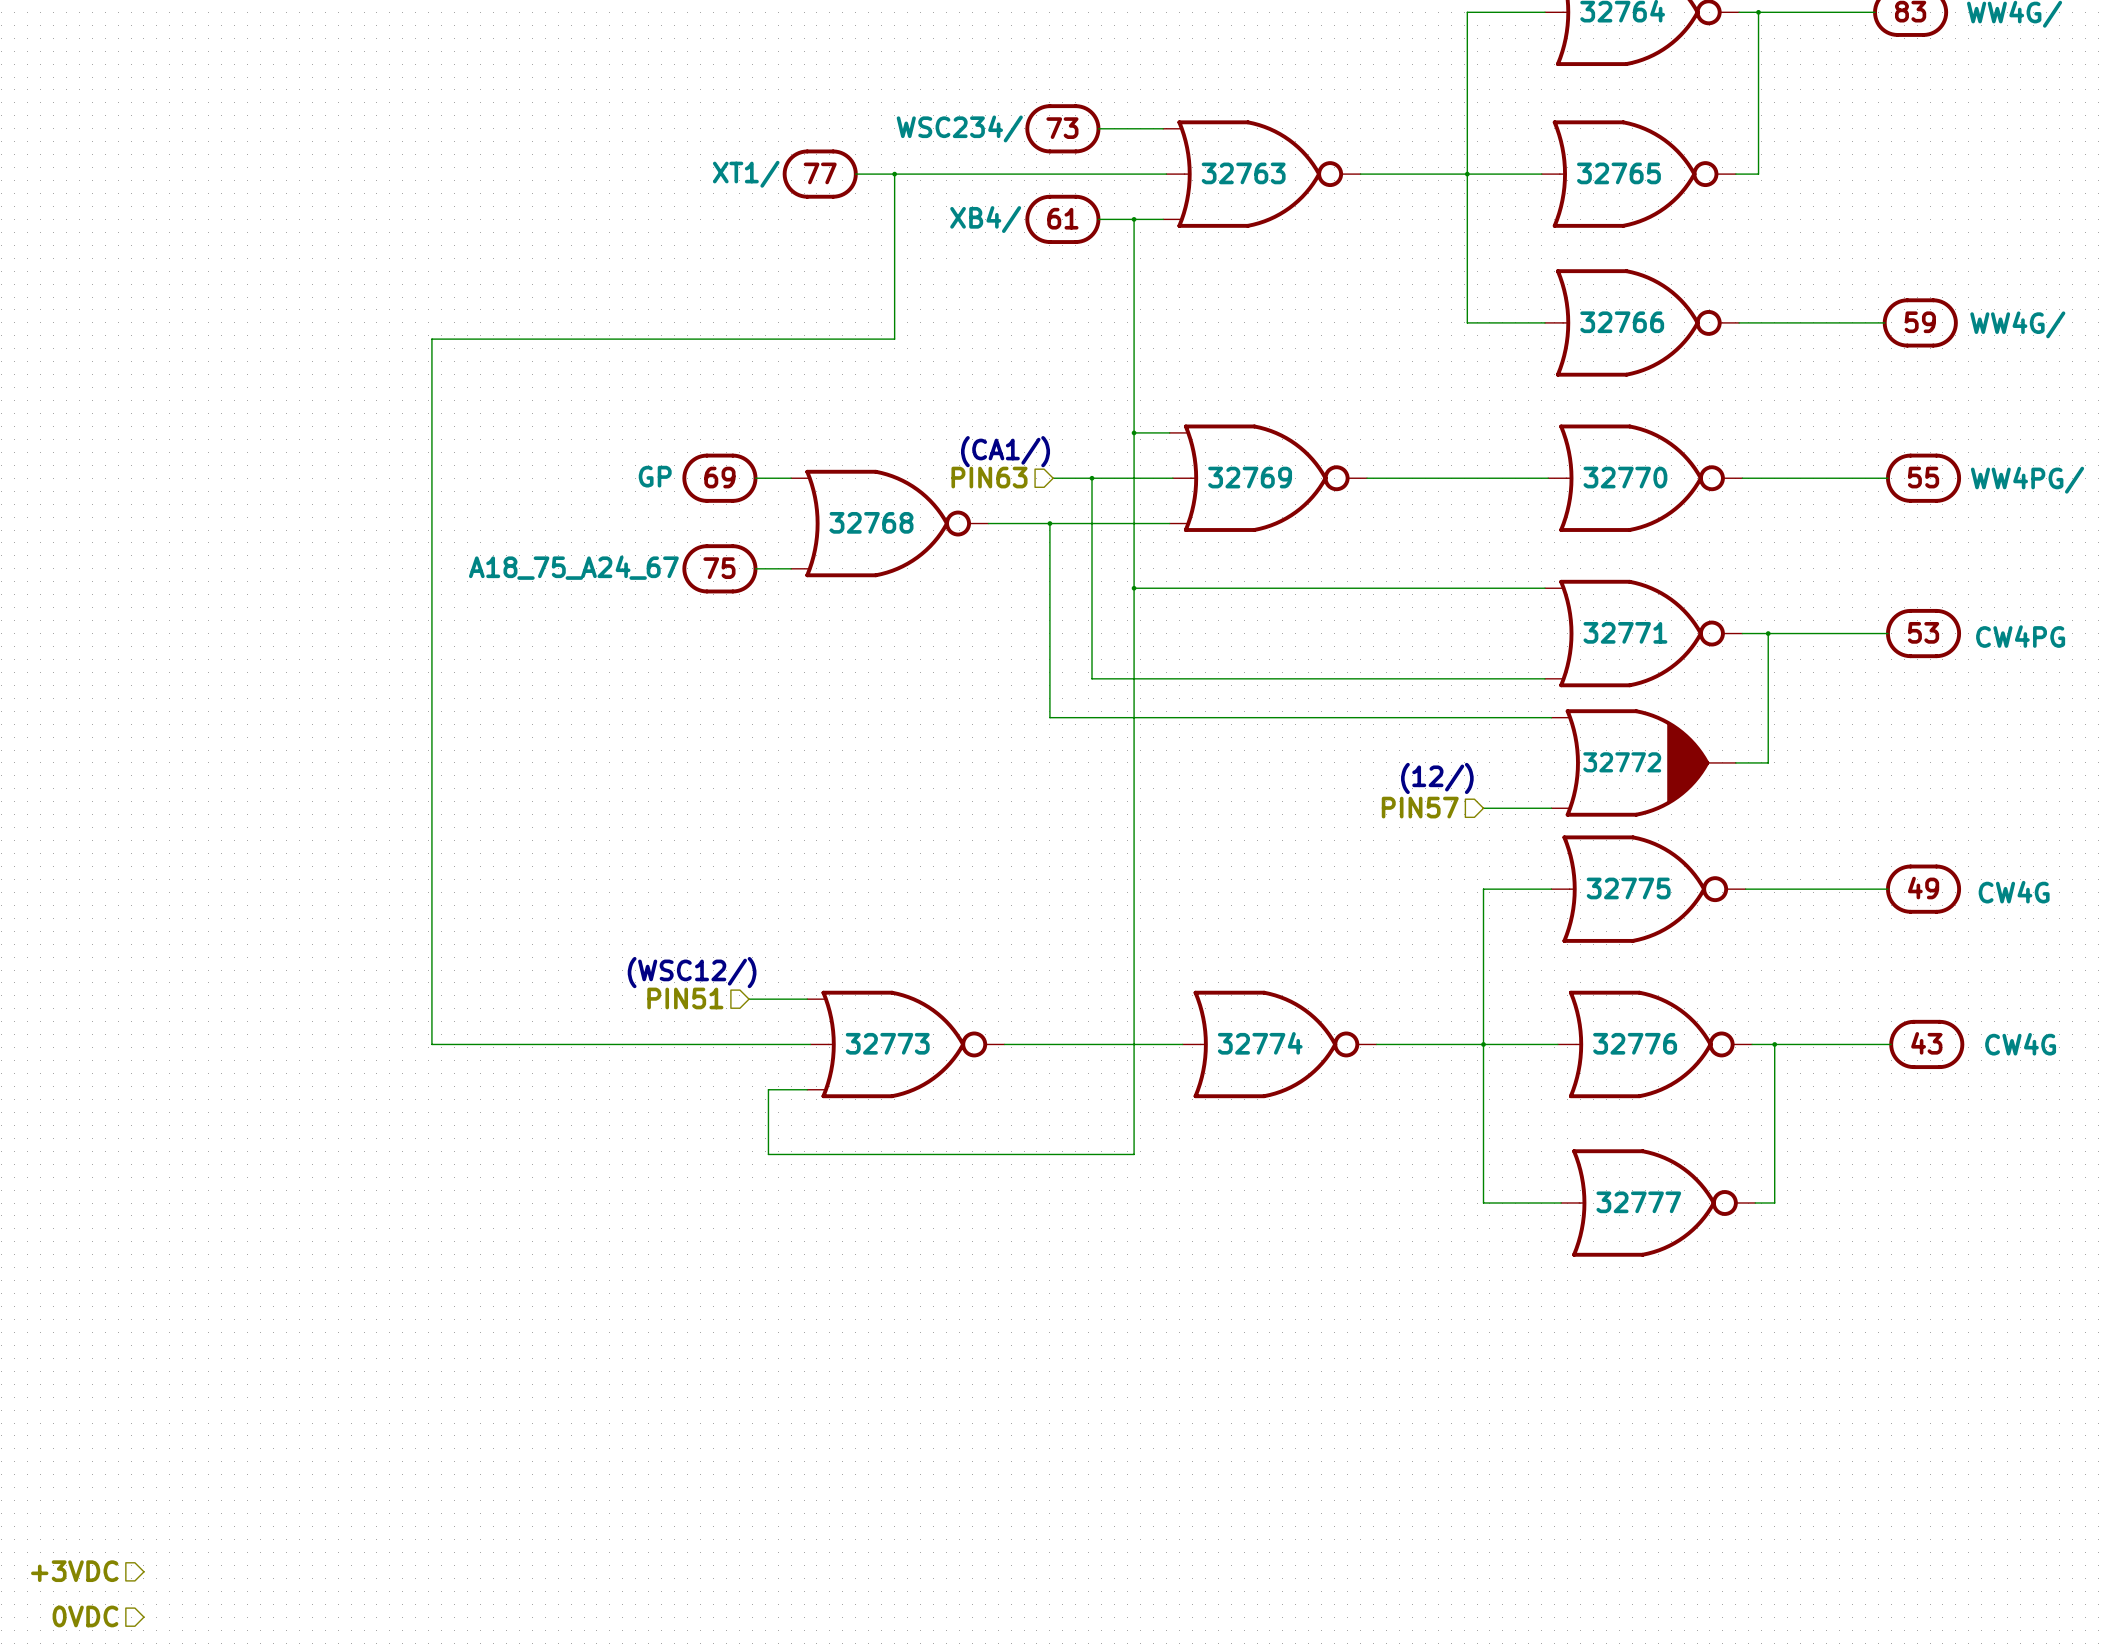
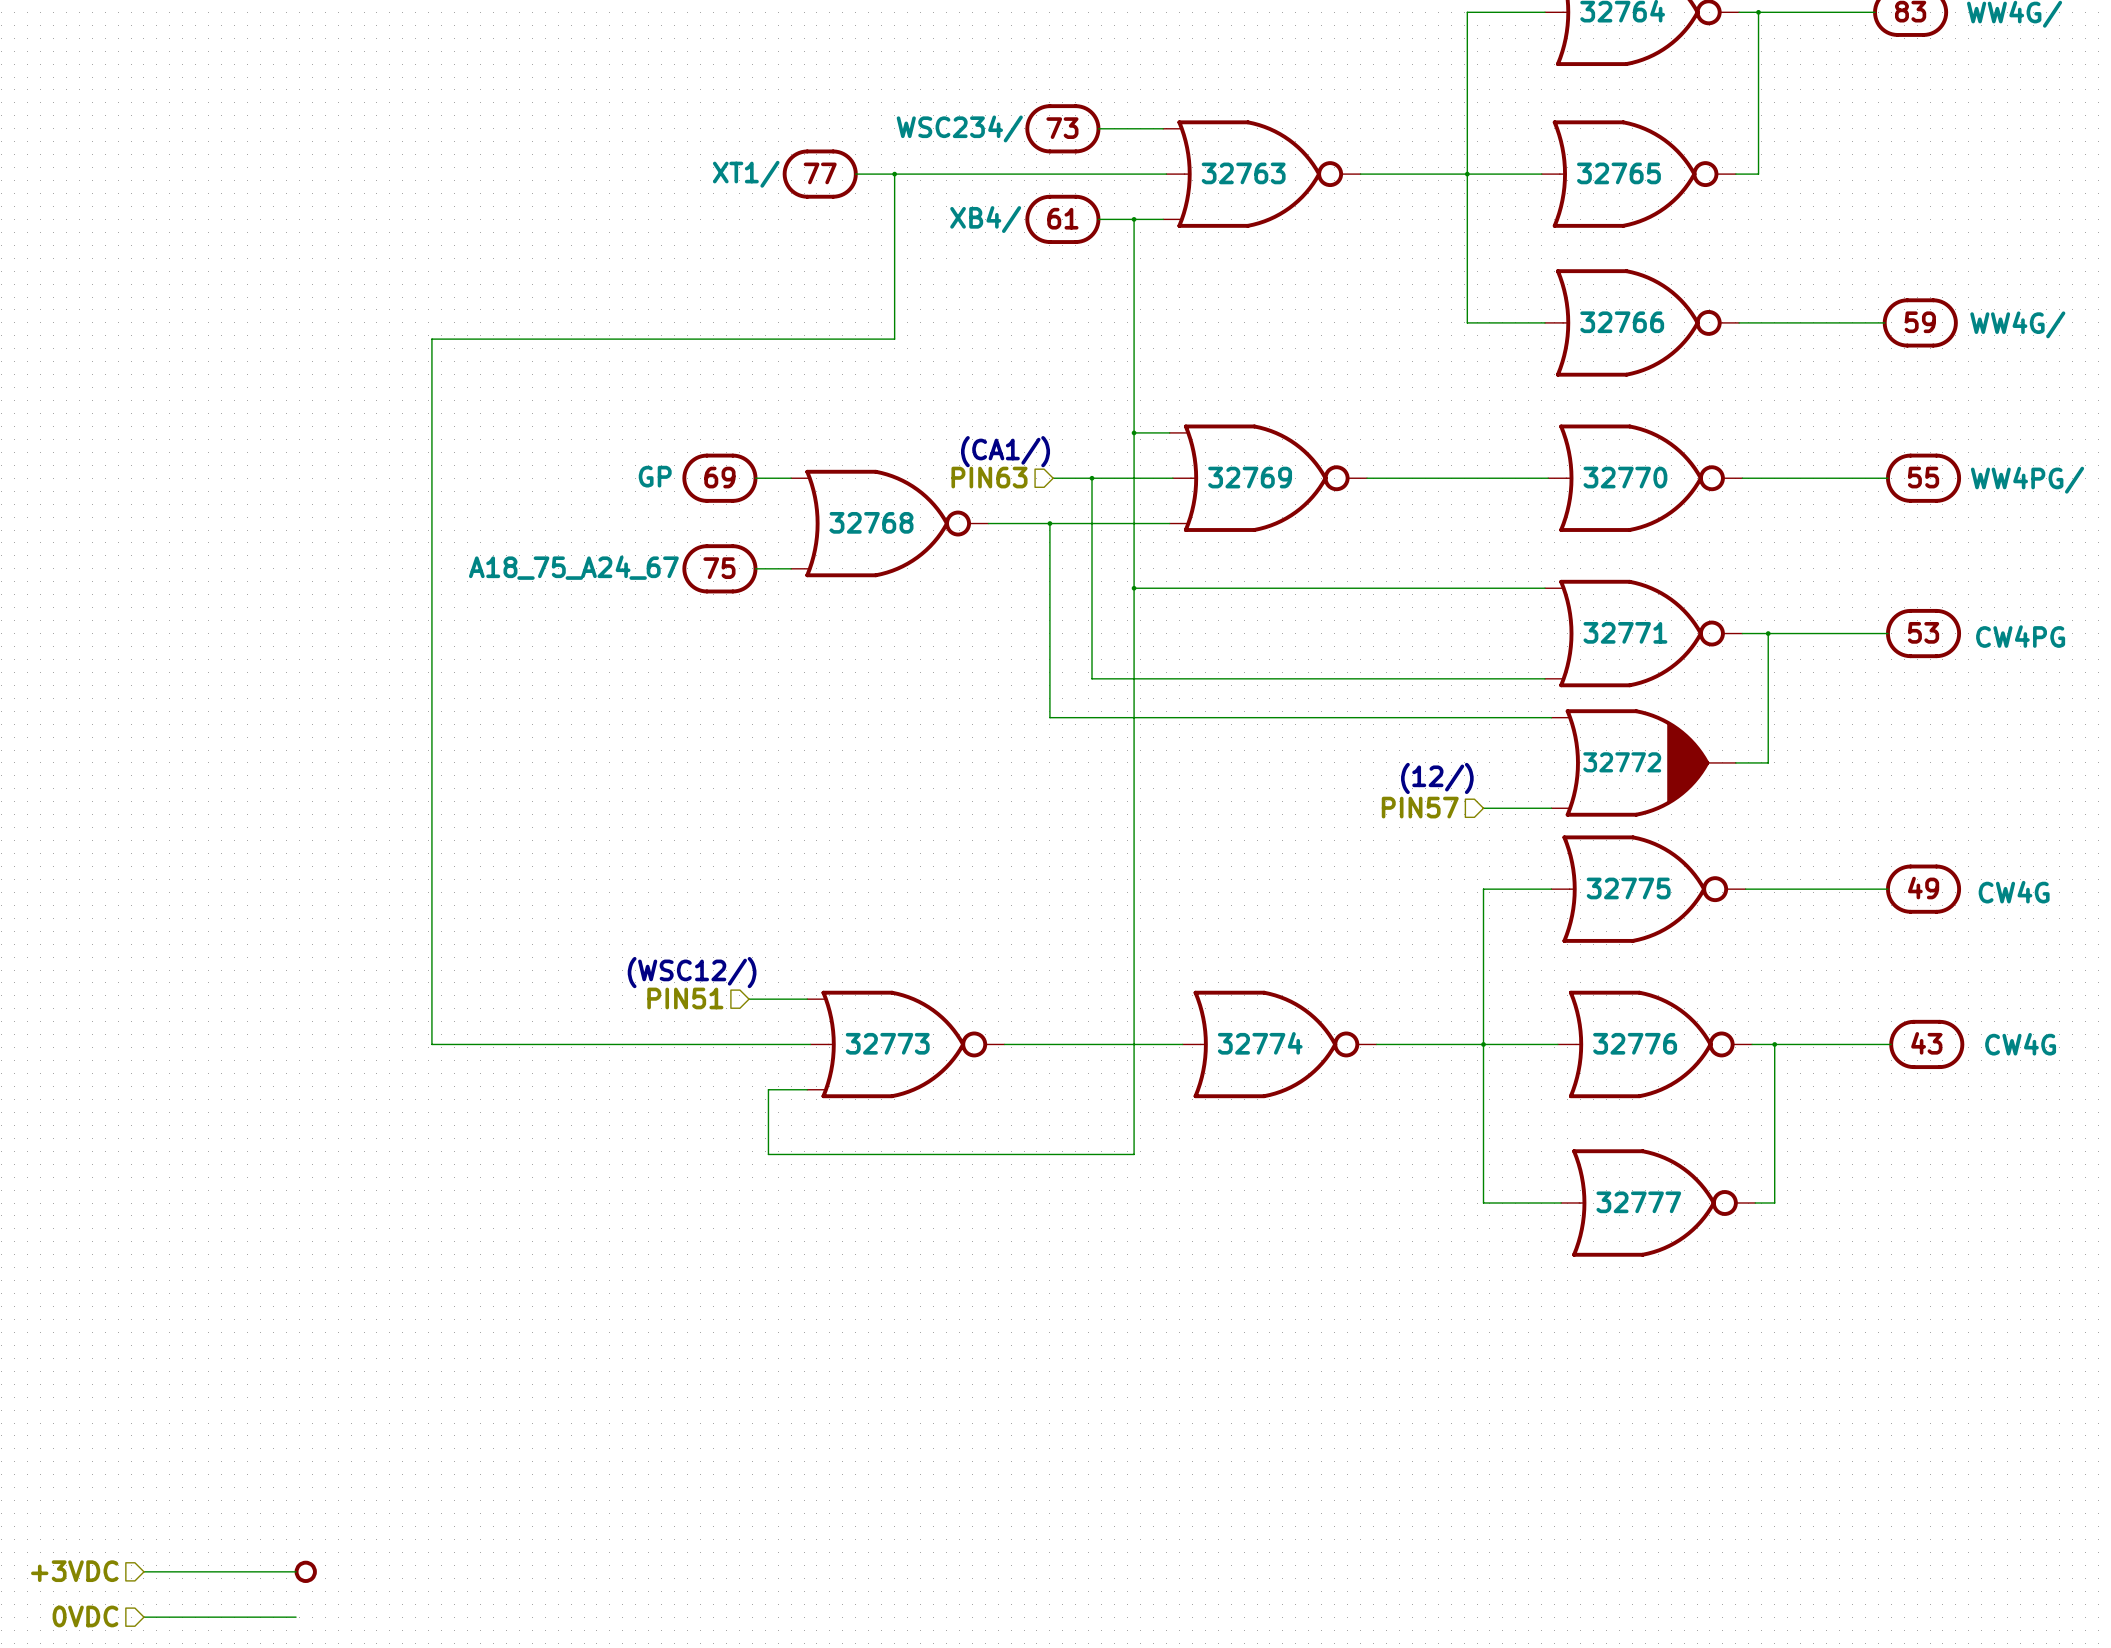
wire: none -> (143, 1571) (296, 1571)
part: none -> (305, 1571)
wire: none -> (143, 1617) (296, 1617)

